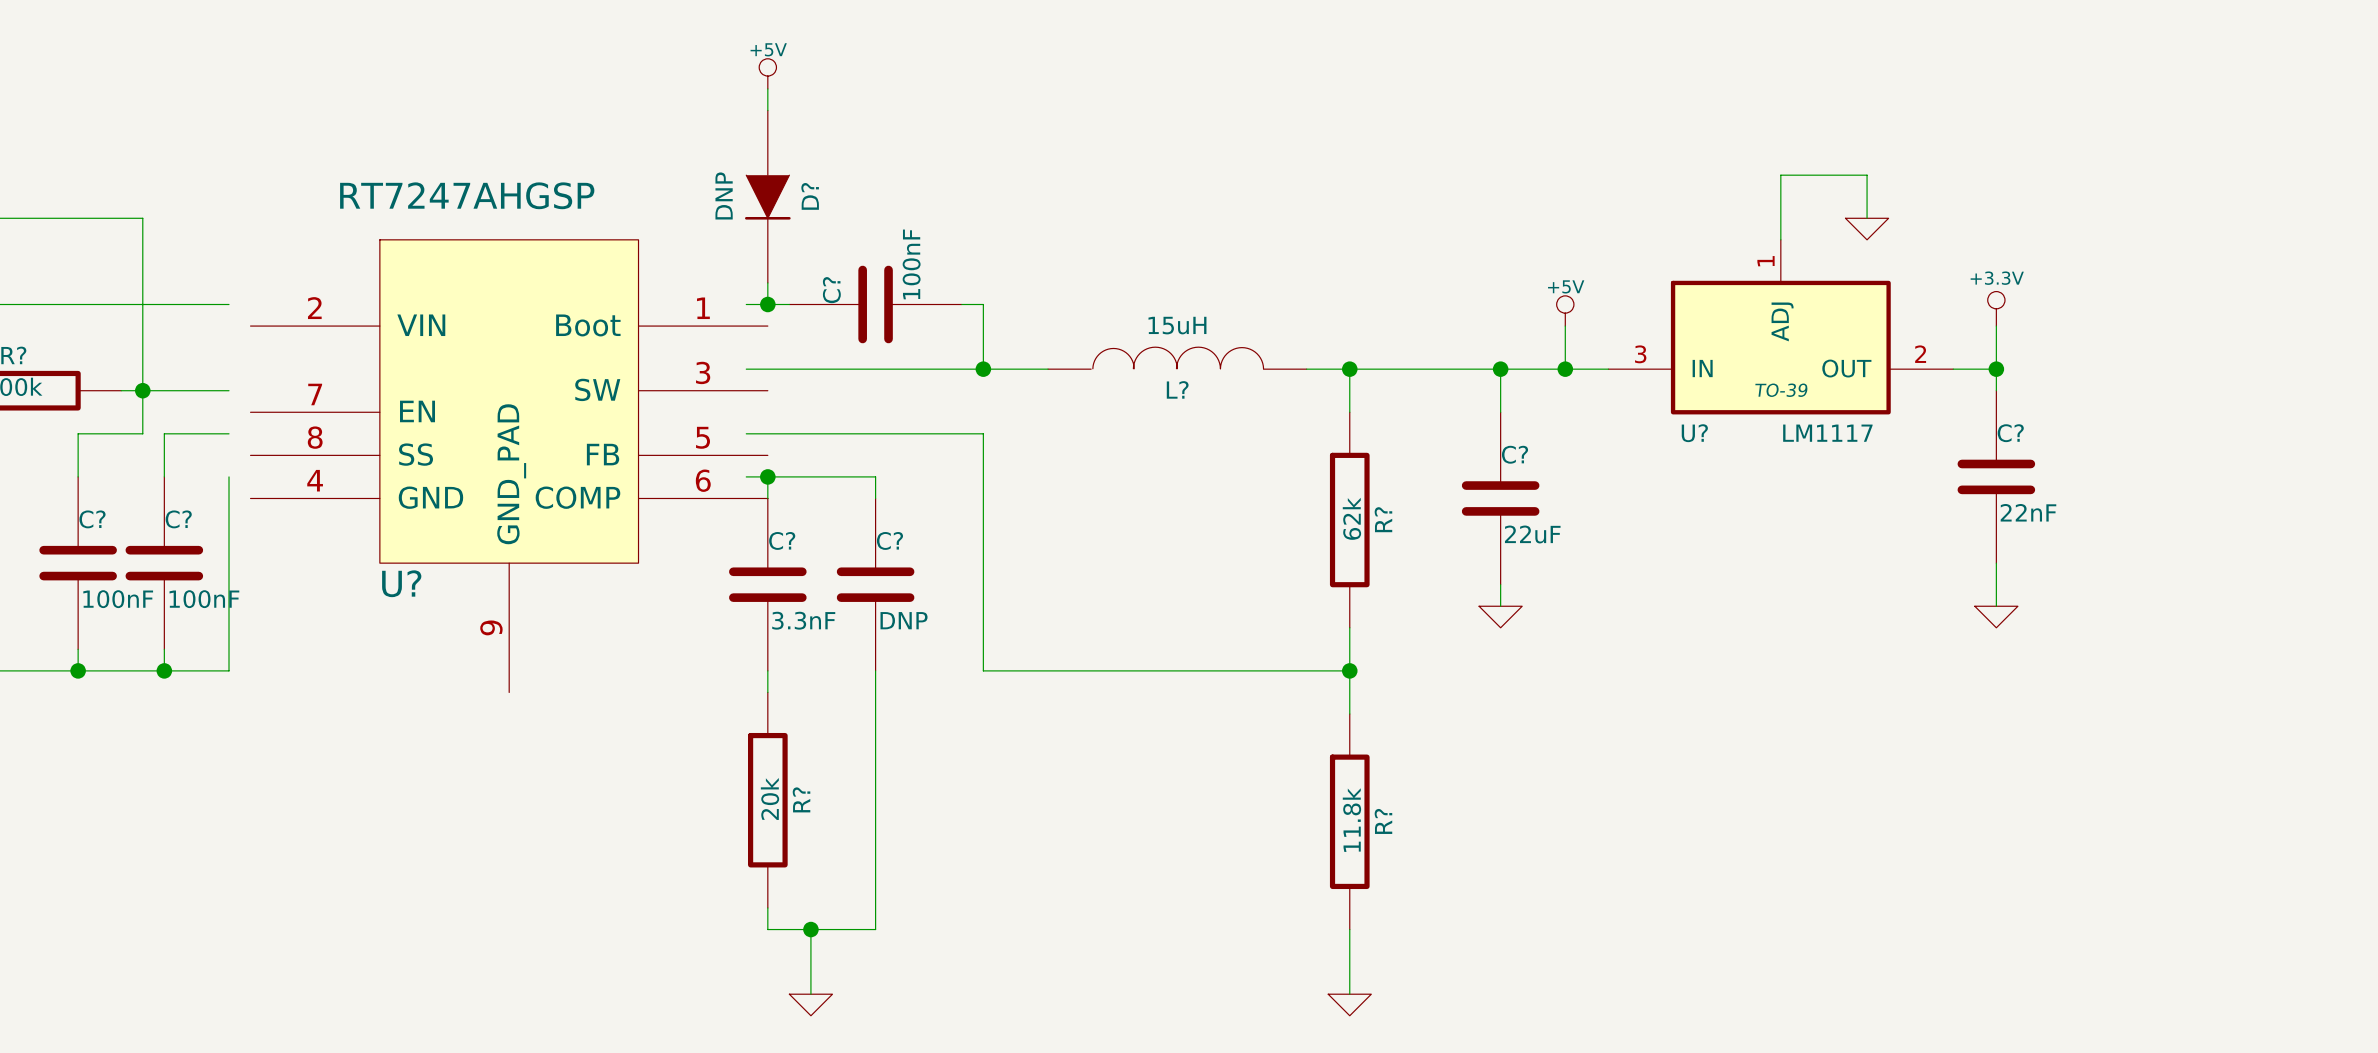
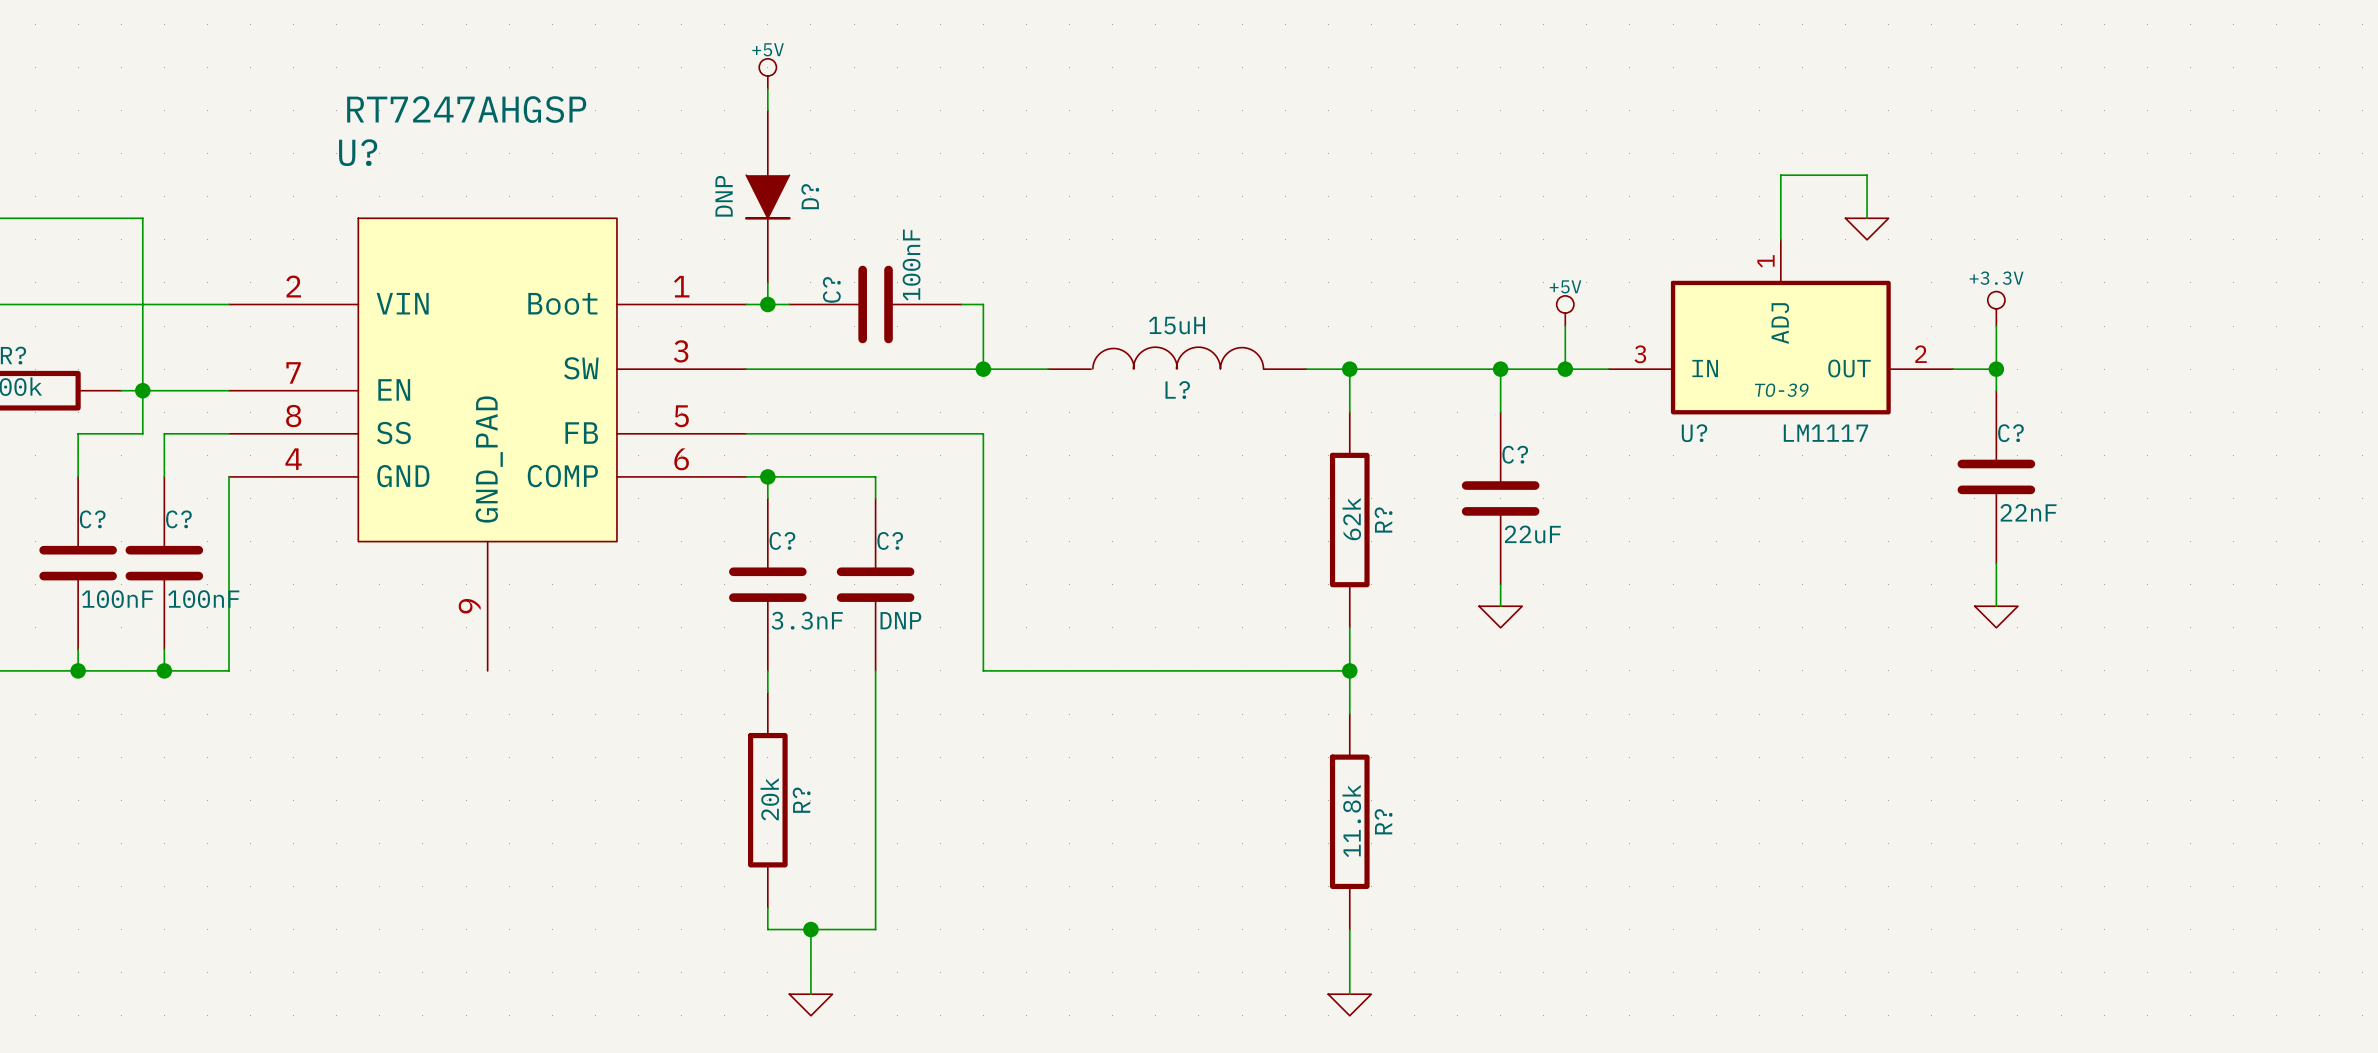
U? value position: RT7247AHGSP (467, 195) -> RT7247AHGSP (466, 109)
U? position: (509, 466) -> (487, 444)
U? name position: U? (401, 583) -> U? (358, 152)

